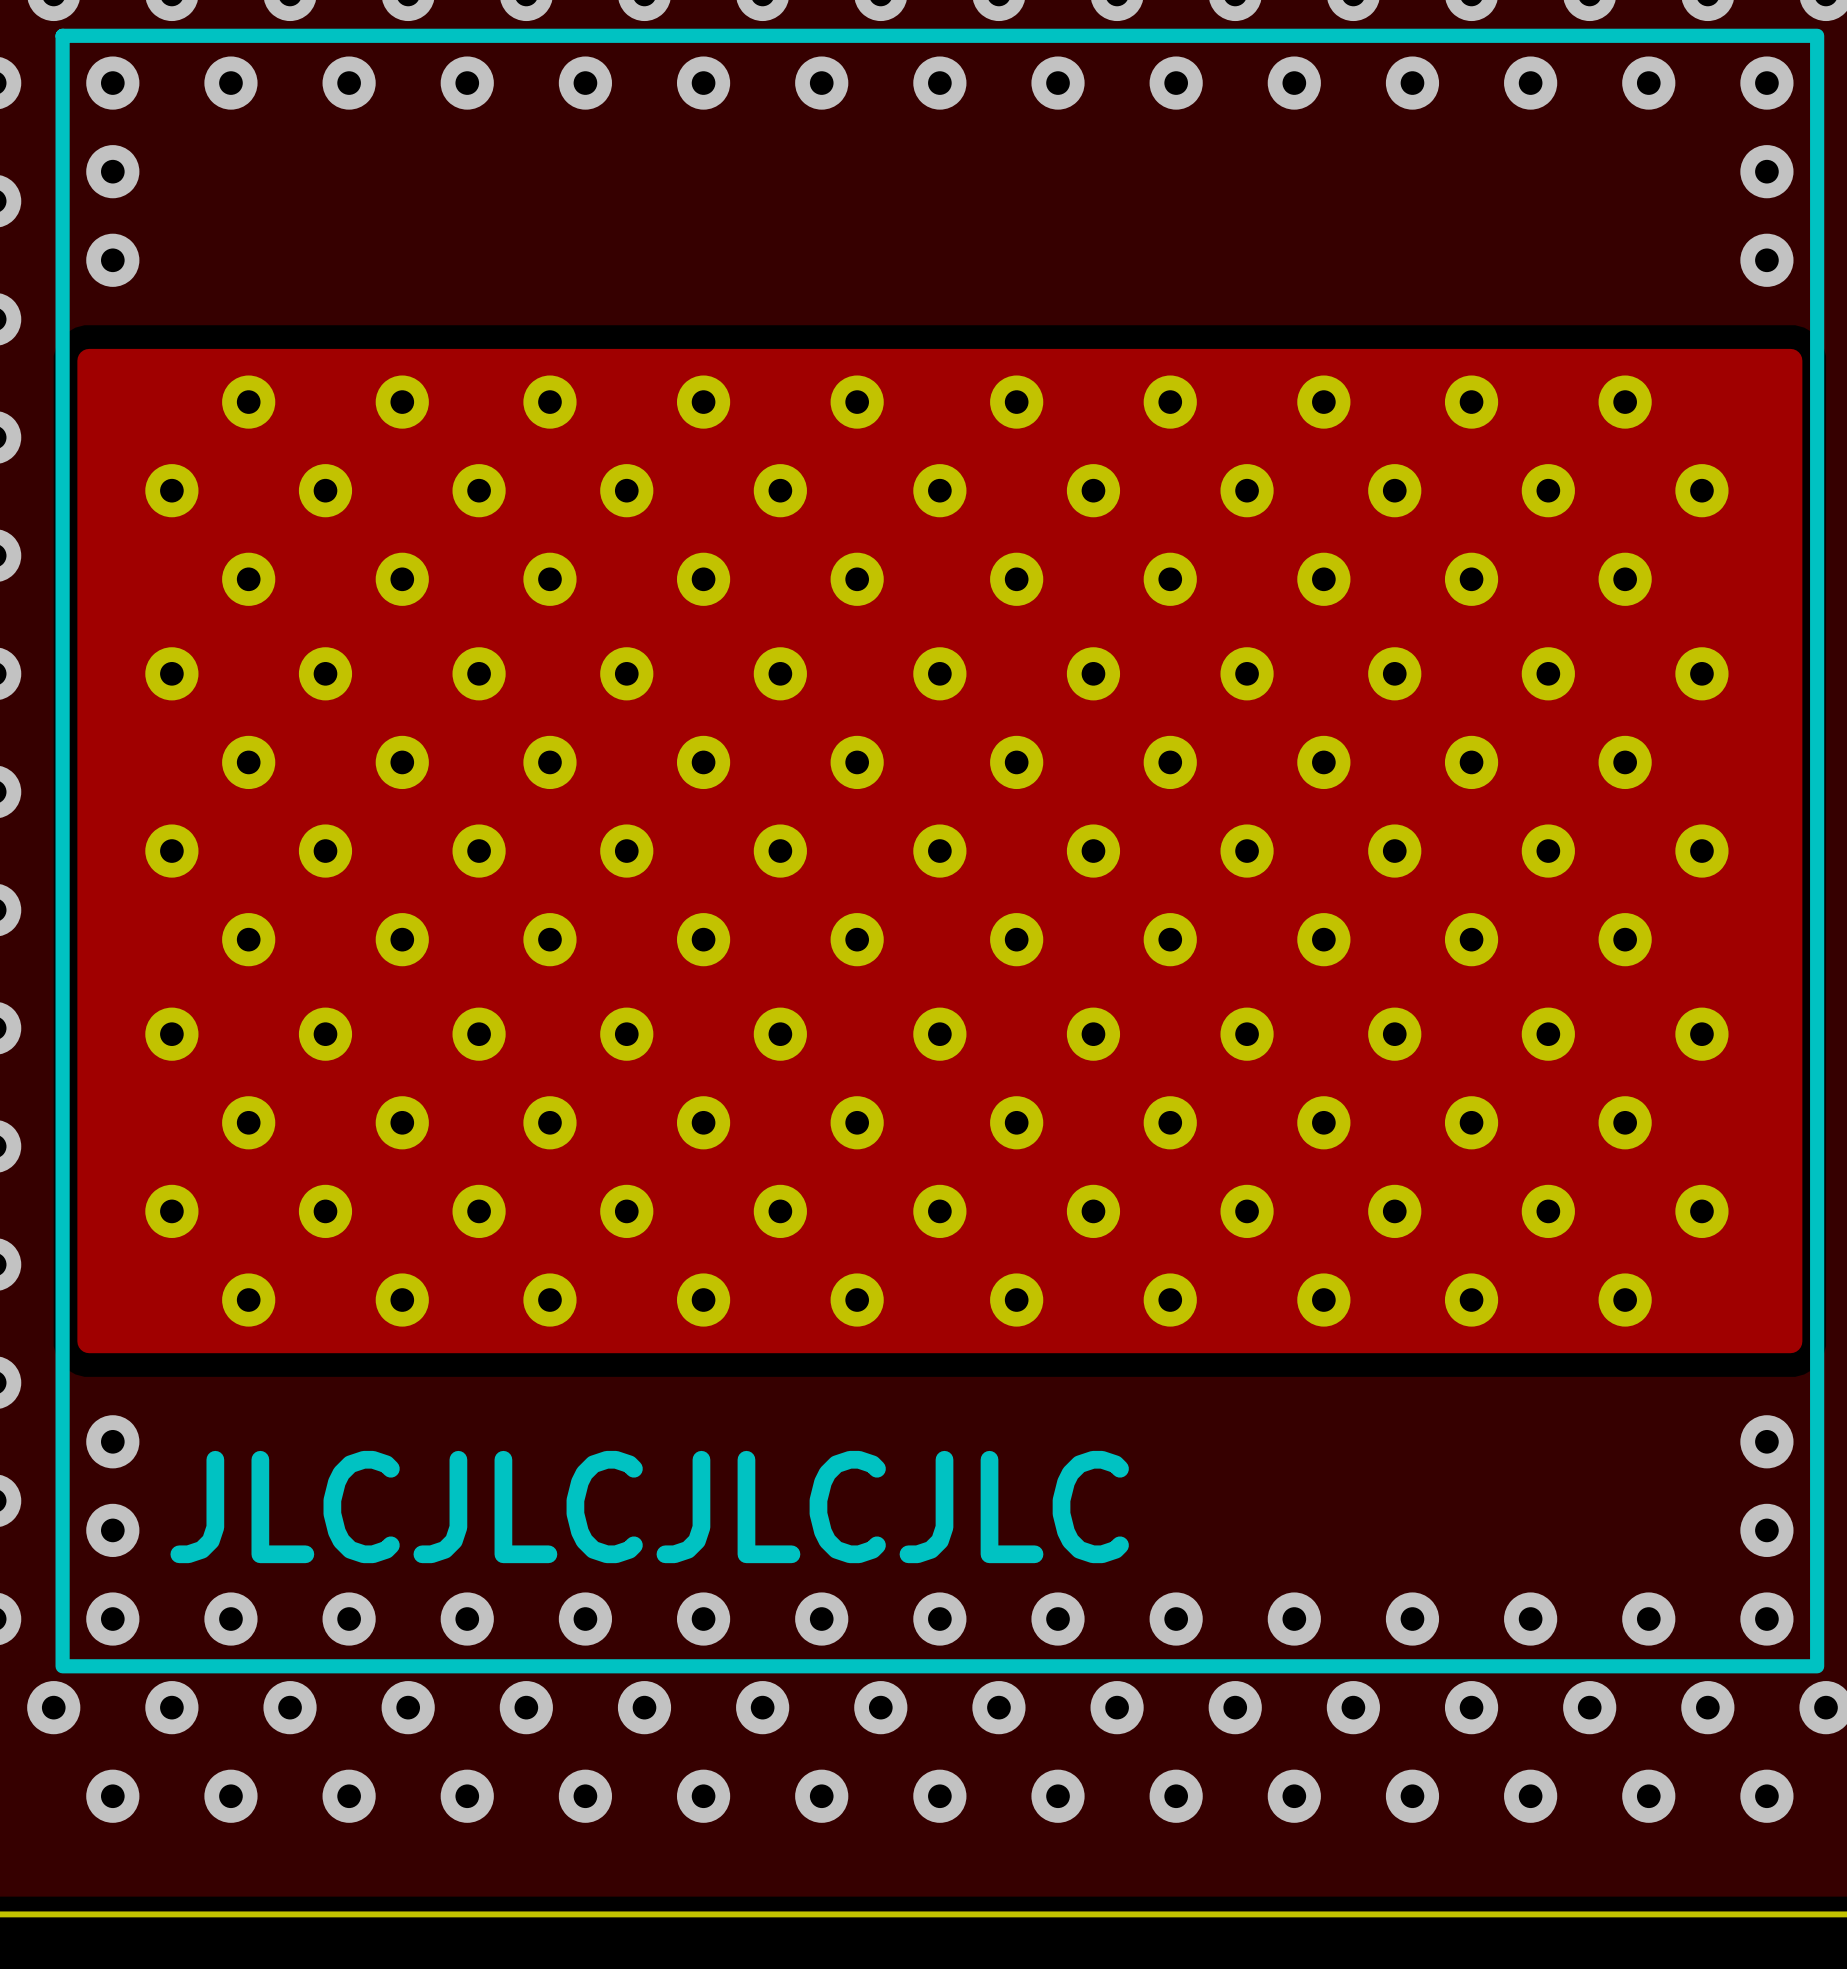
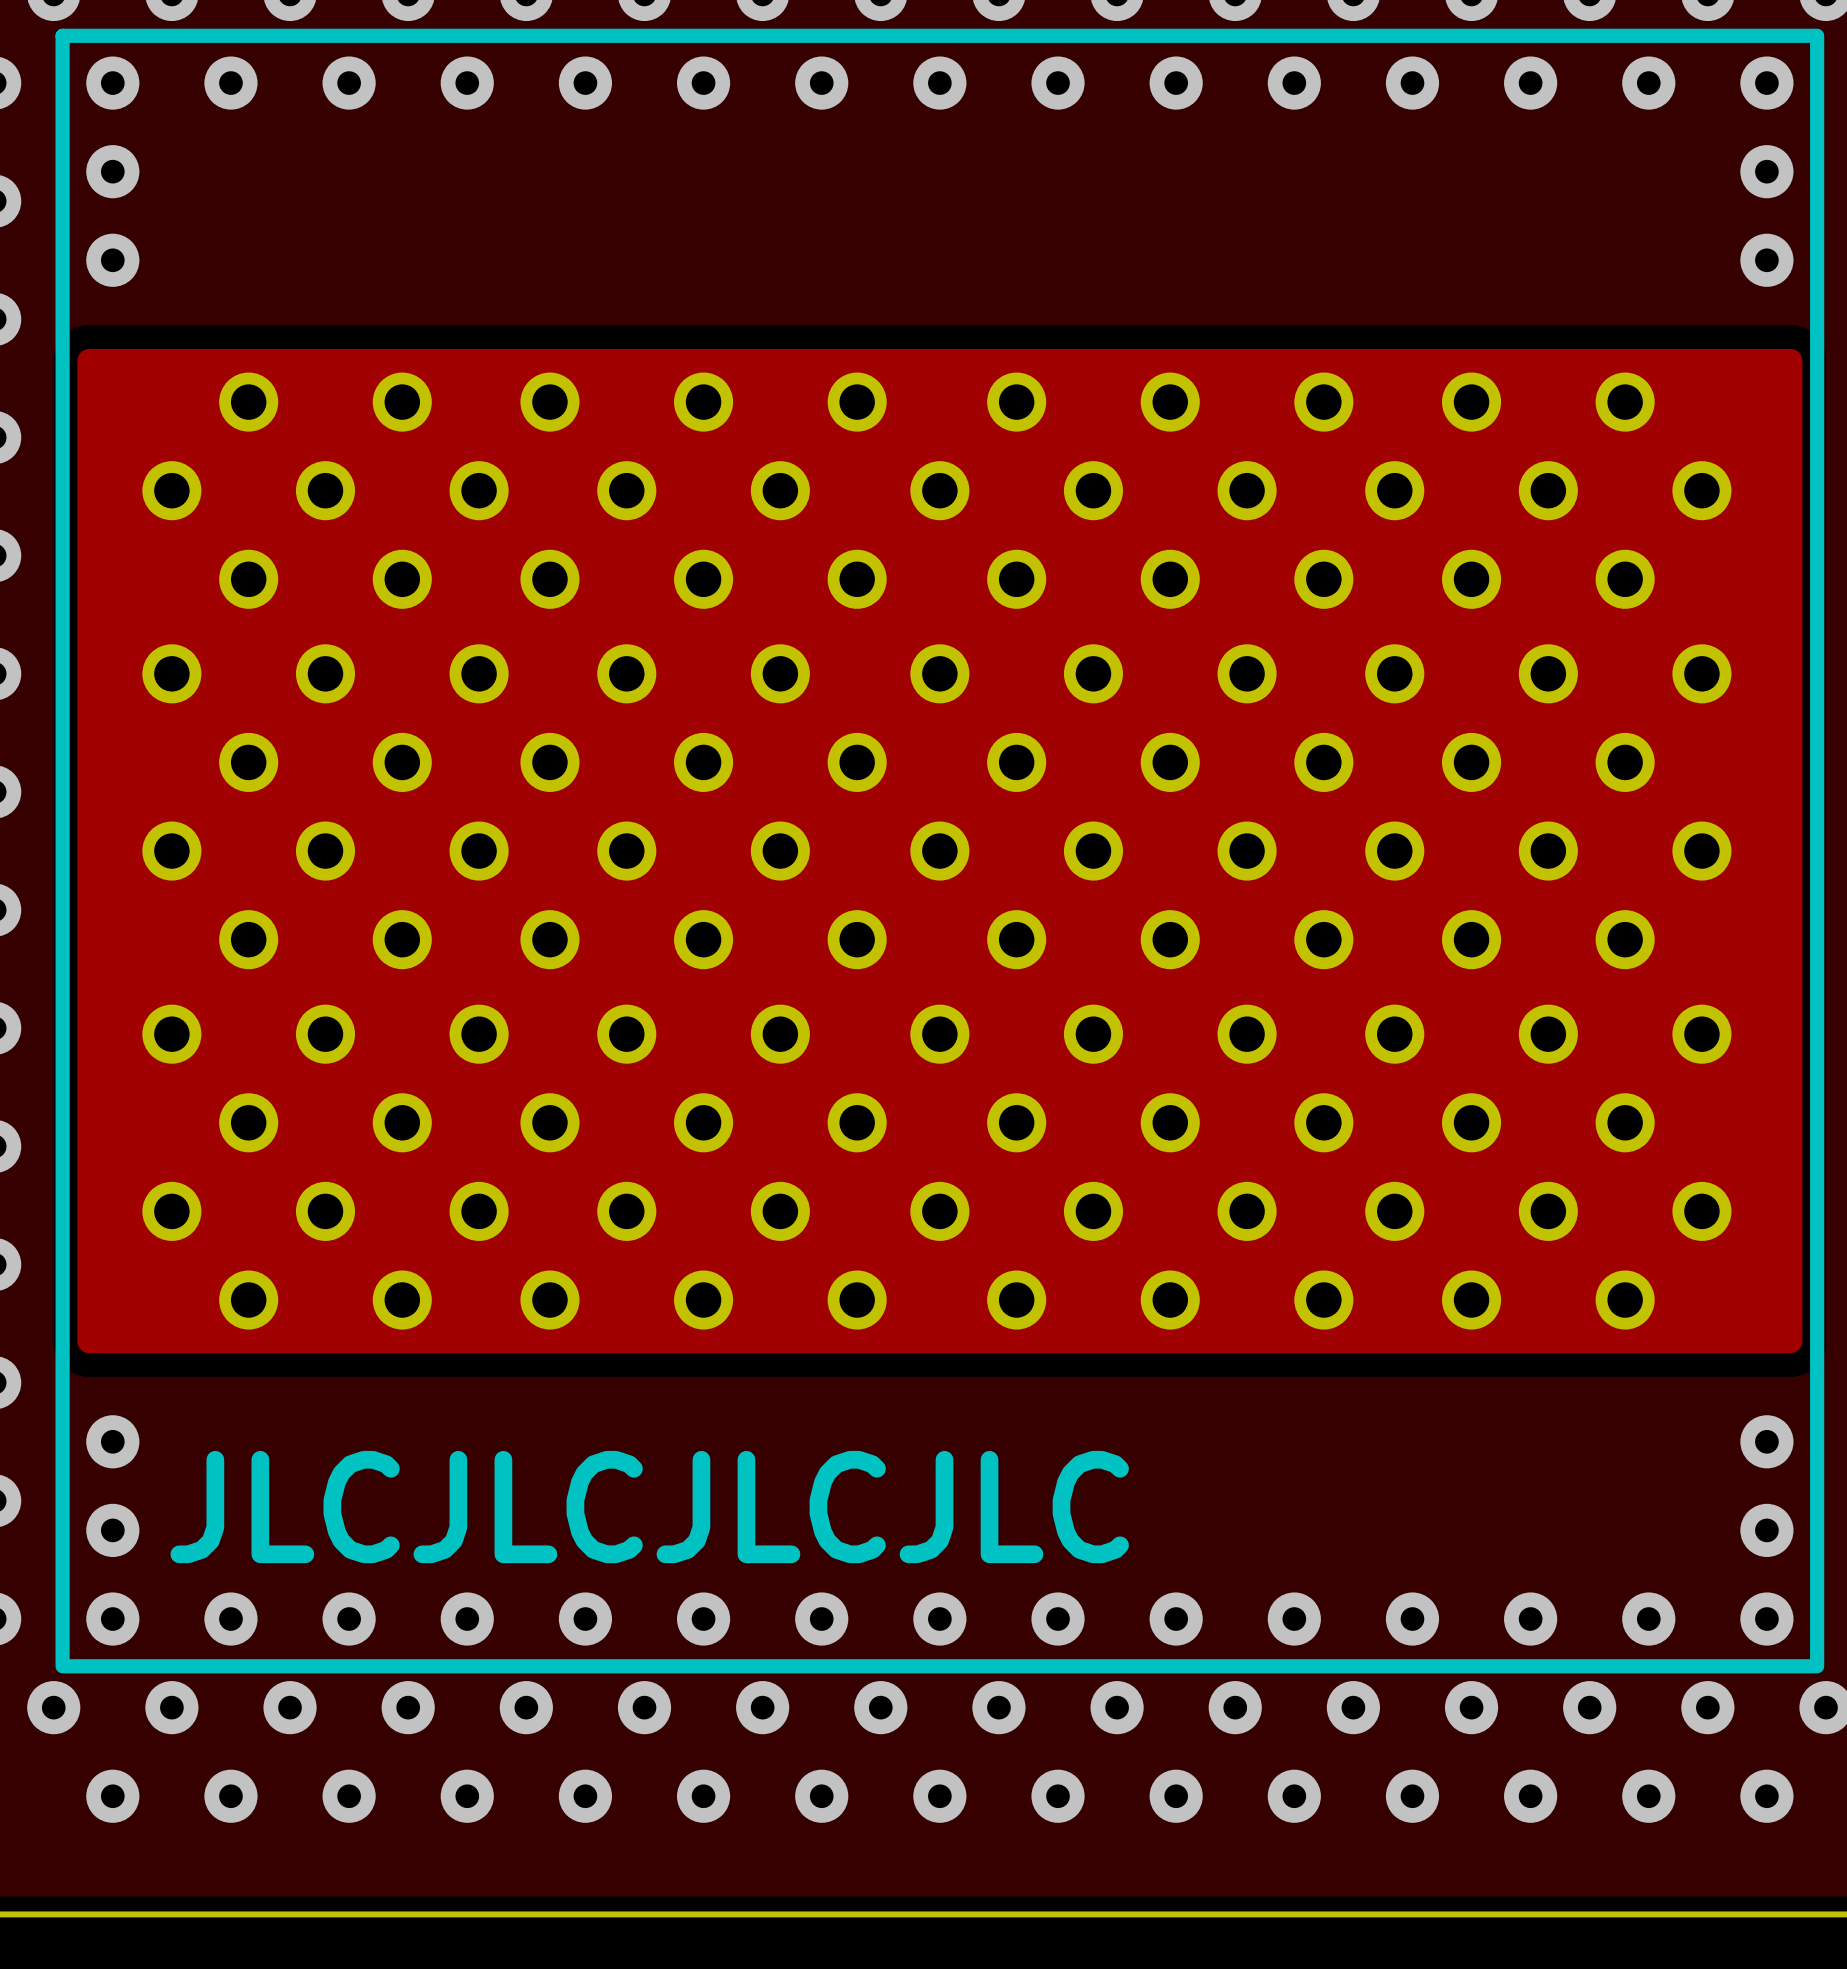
part footprint: [55, 28, 1825, 1674] -> [55, 28, 1825, 1674]

